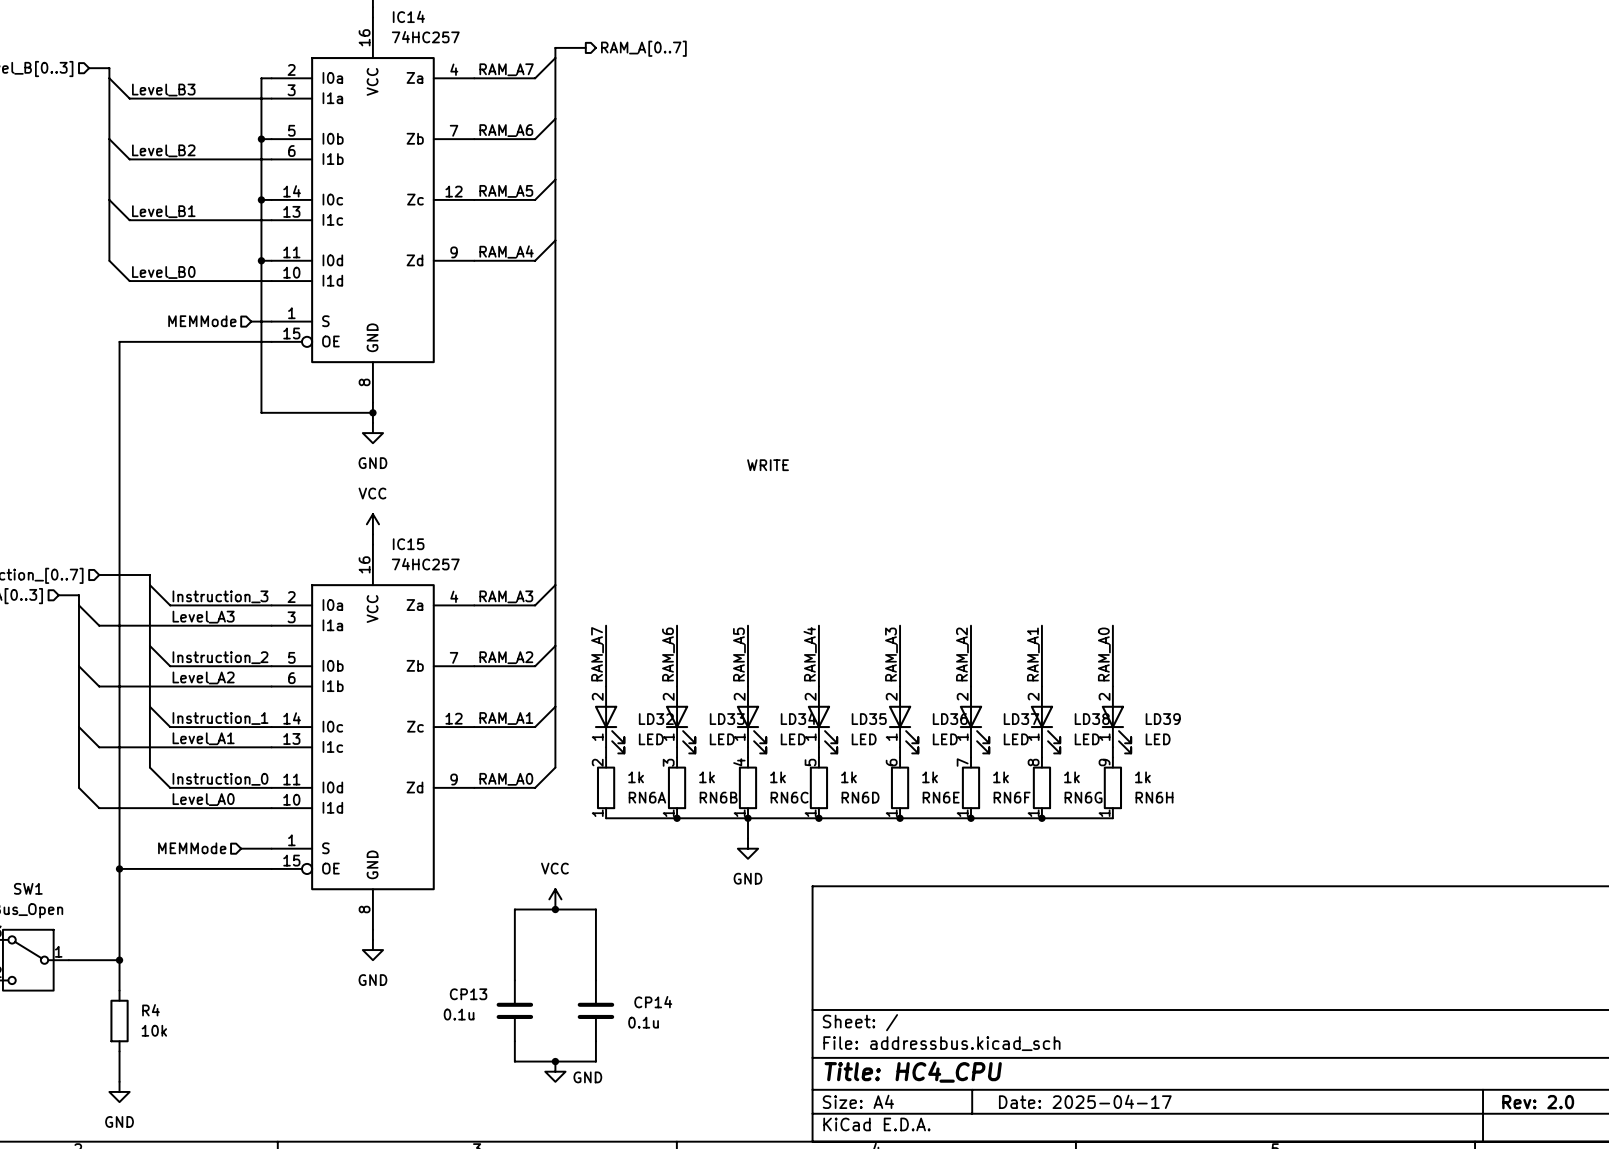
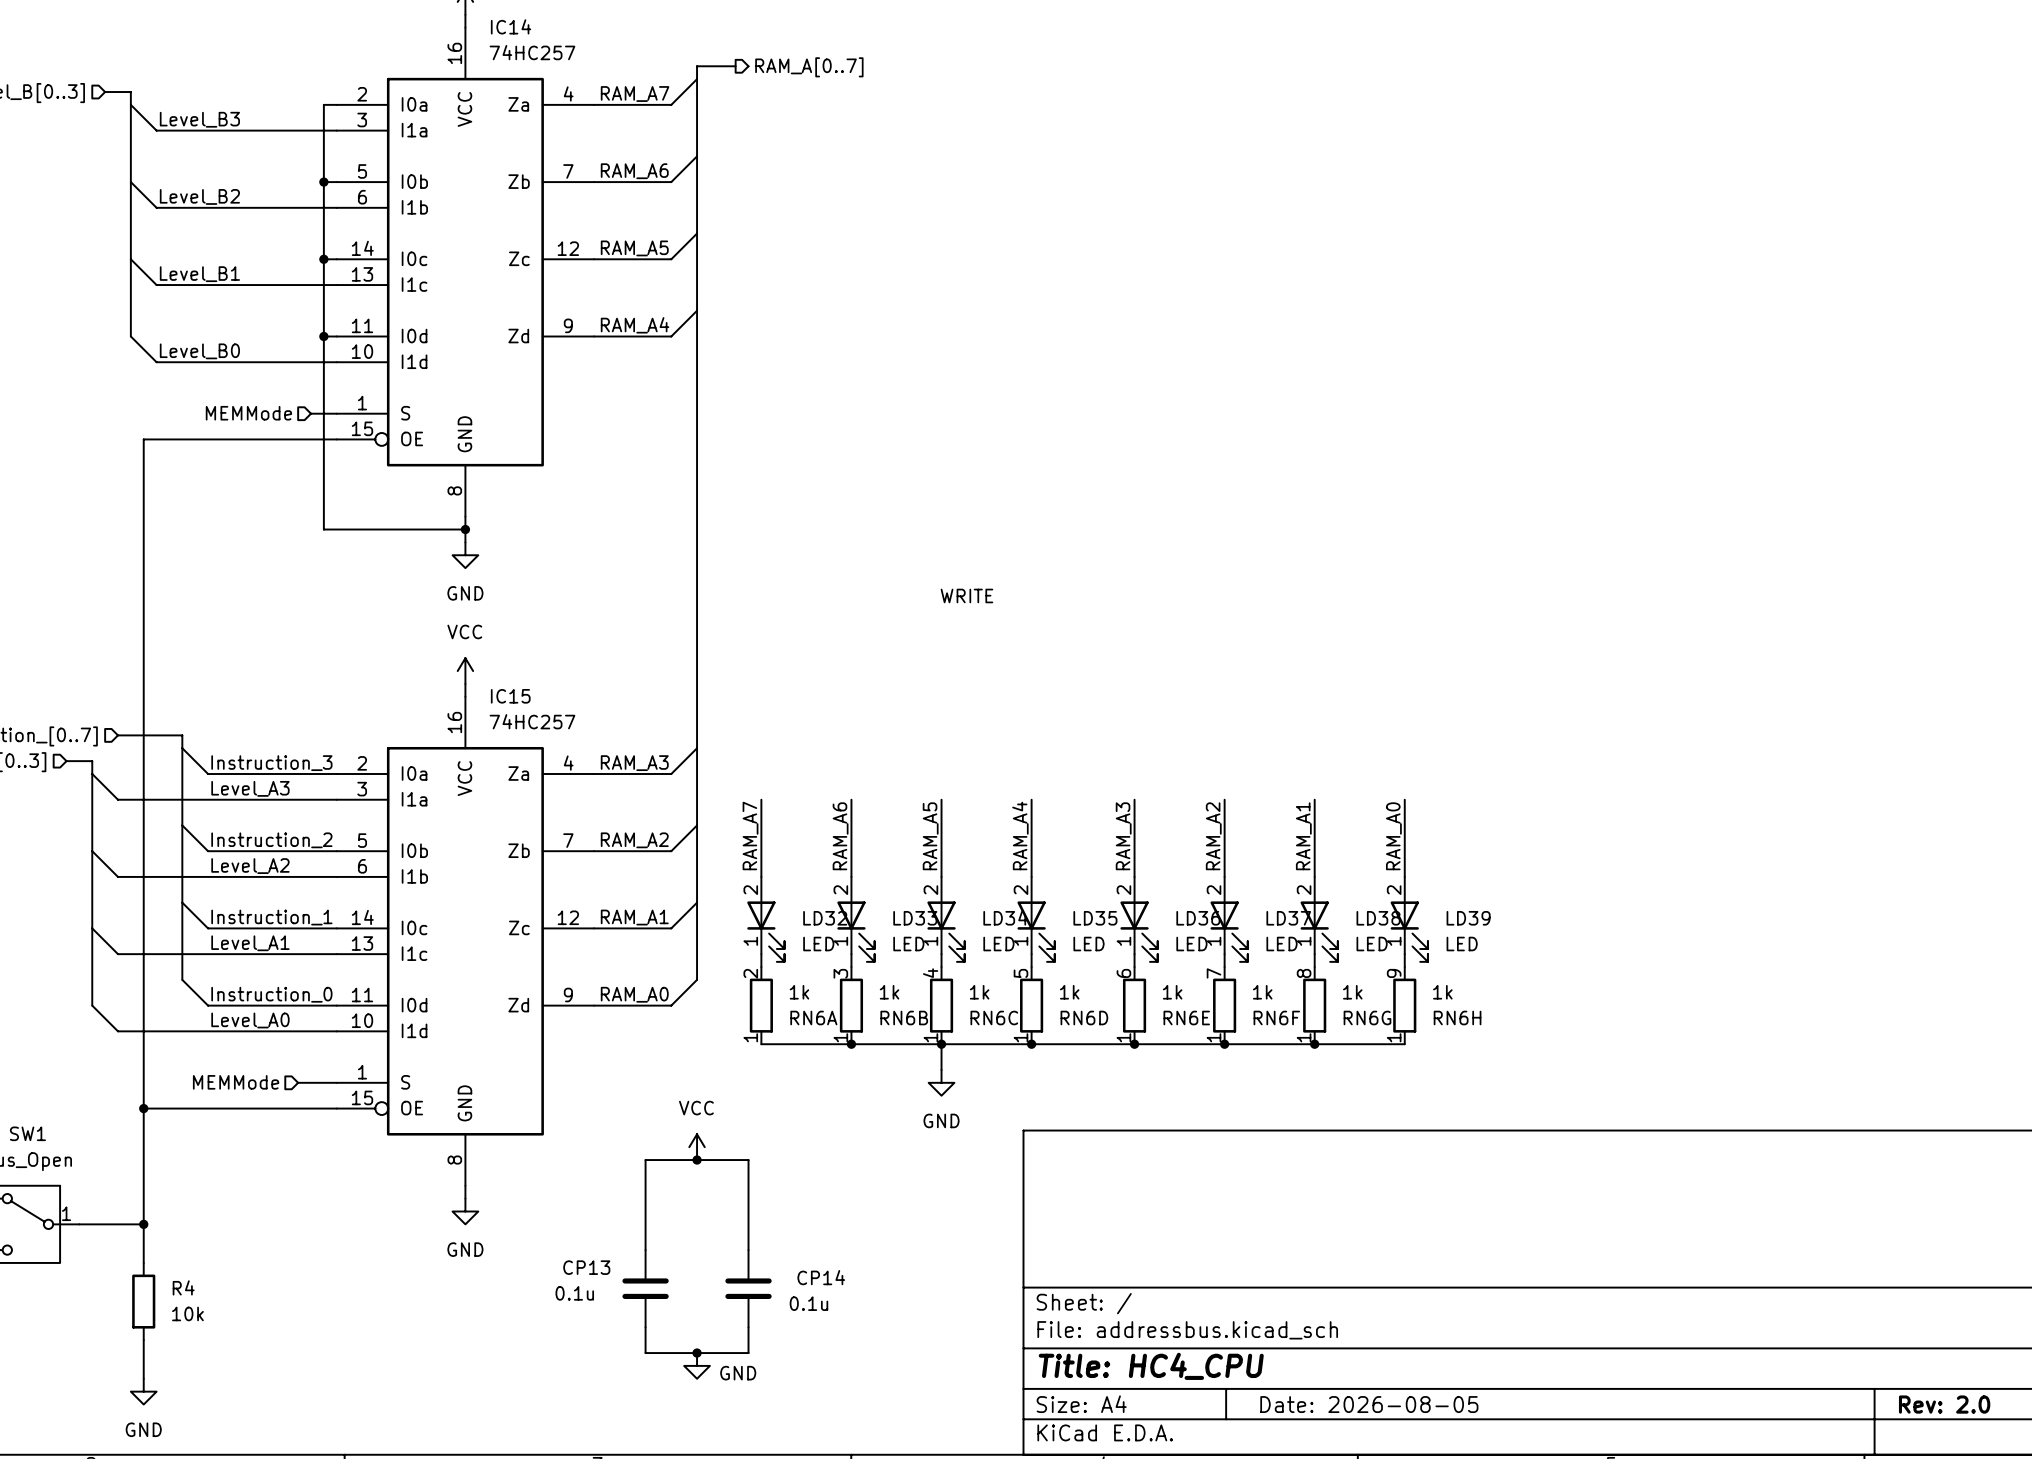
title block: Date: 2025-04-17 (1085, 1101) -> Date: 2026-08-05 (1369, 1404)

